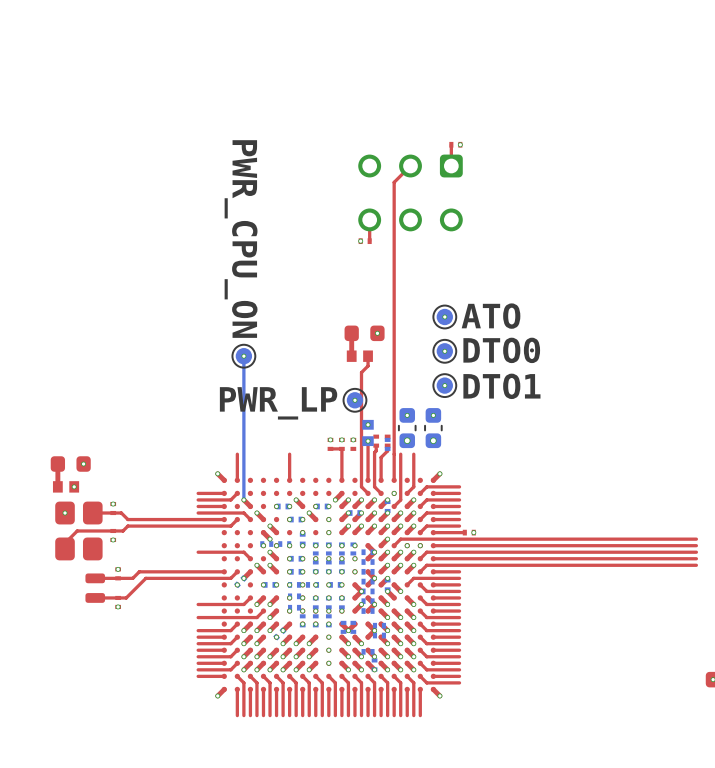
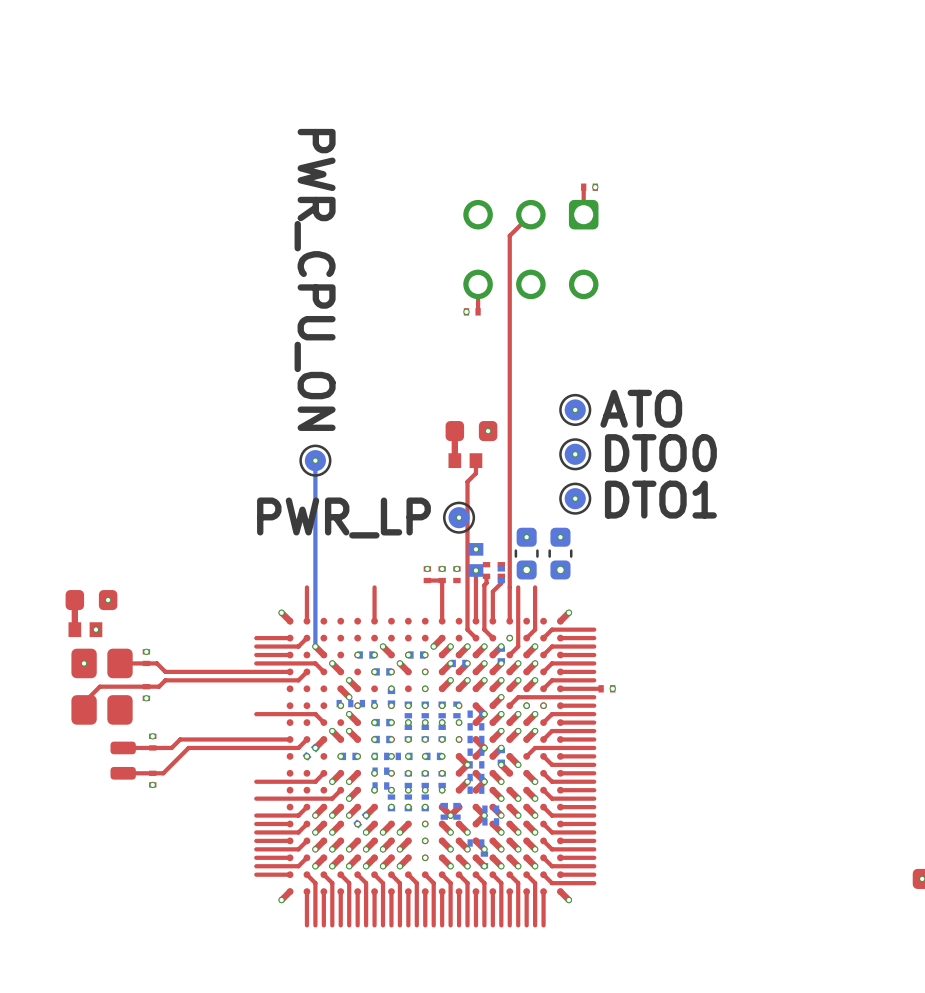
top track: (696, 539) (459, 539) -> none
top track: (696, 545) (459, 545) -> none
top track: (696, 552) (459, 552) -> none
top track: (696, 558) (459, 558) -> none
top track: (696, 565) (459, 565) -> none

